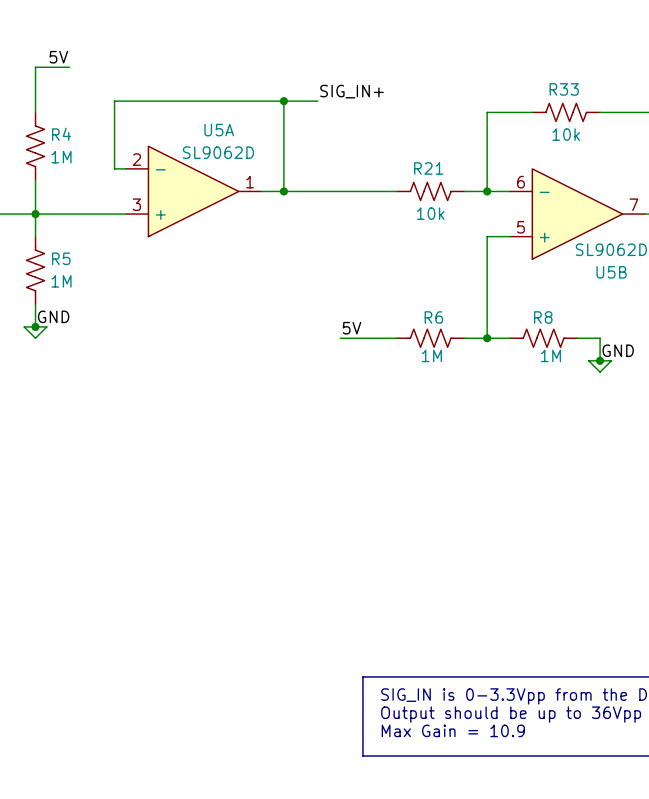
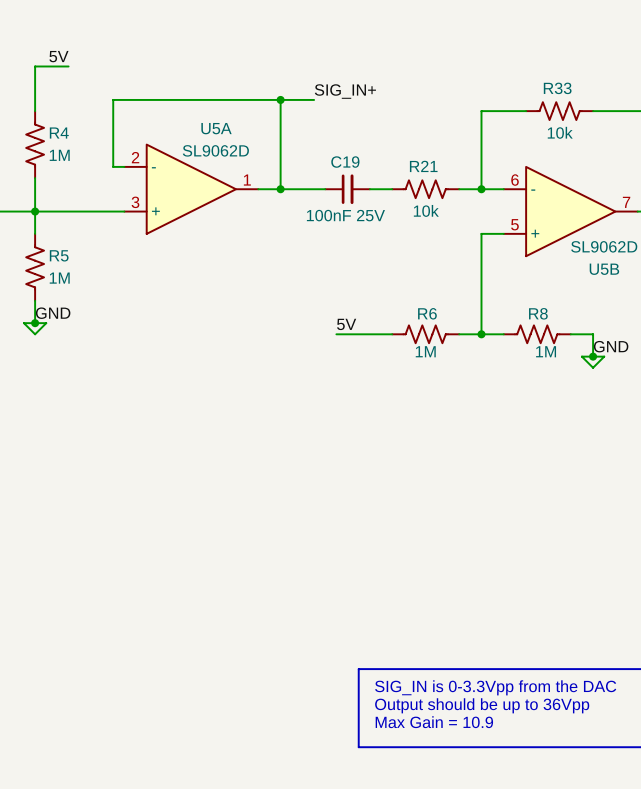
C19: none -> 100nF 25V (347, 189)

